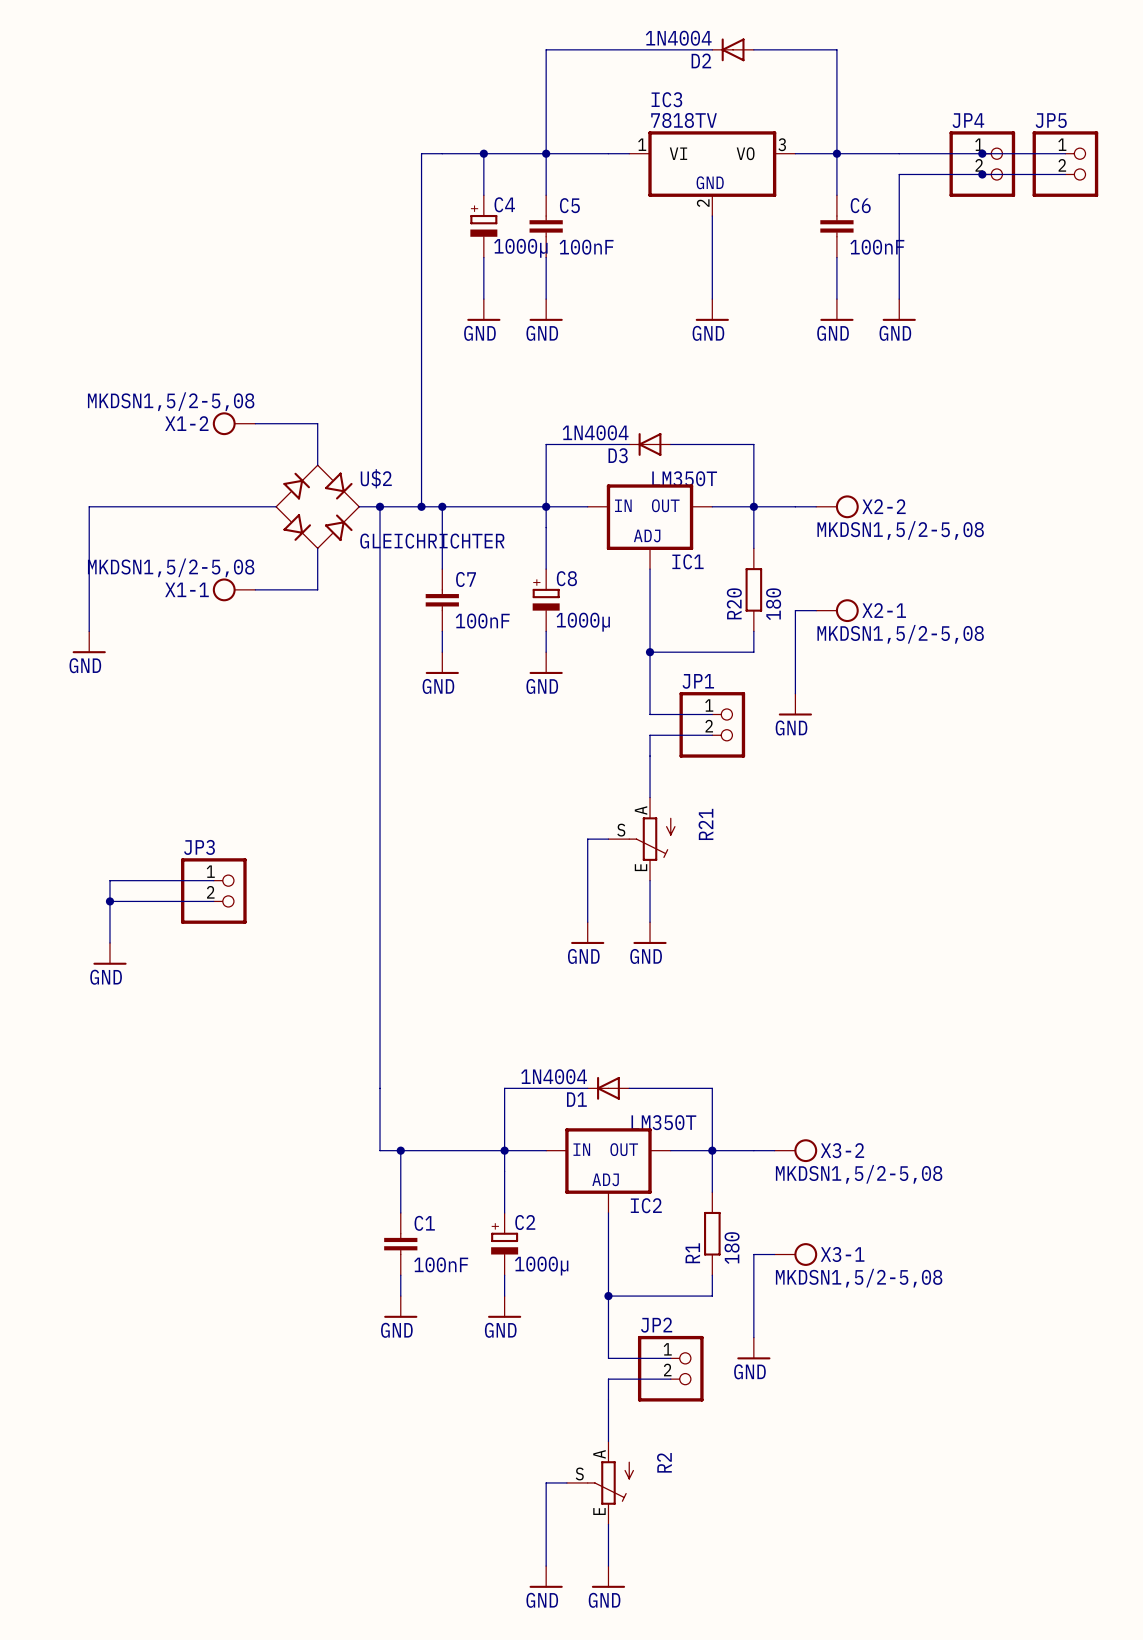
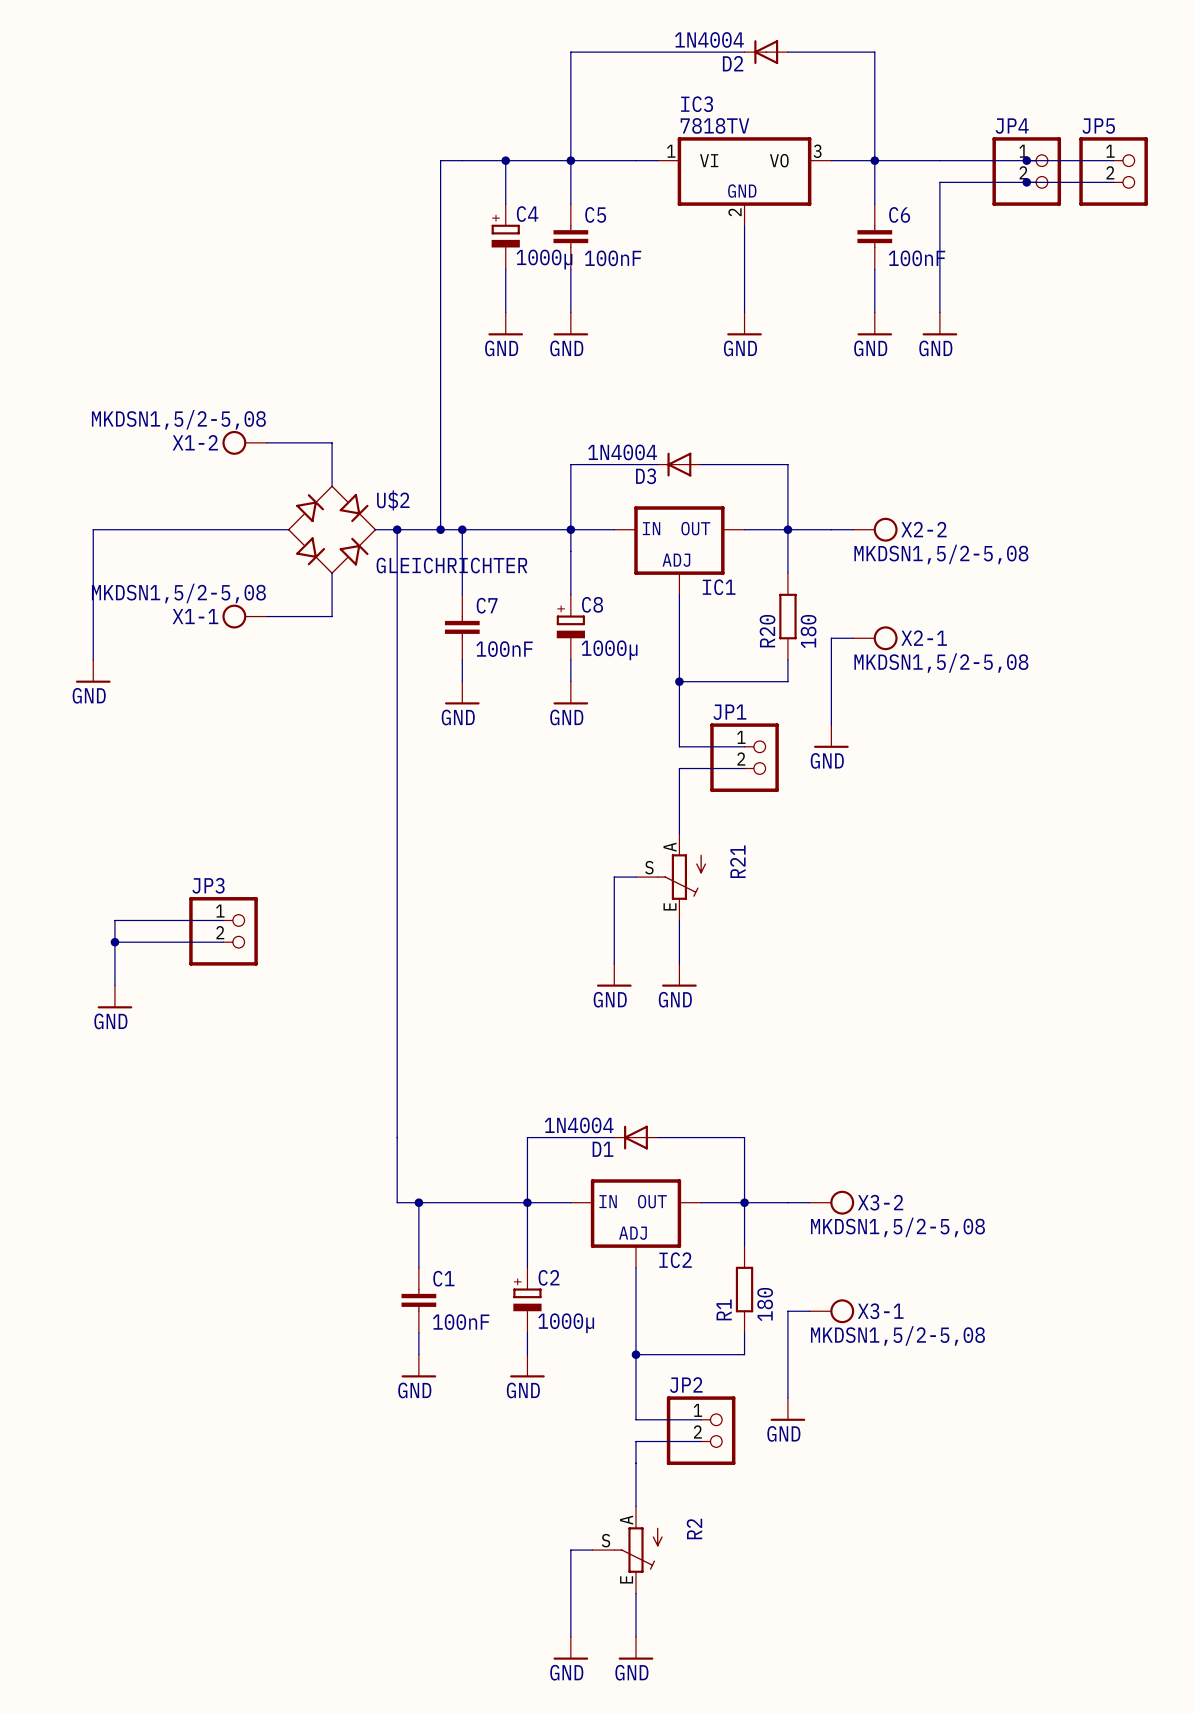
text: LM350T (684, 478) -> none
text: LM350T (663, 1122) -> none

